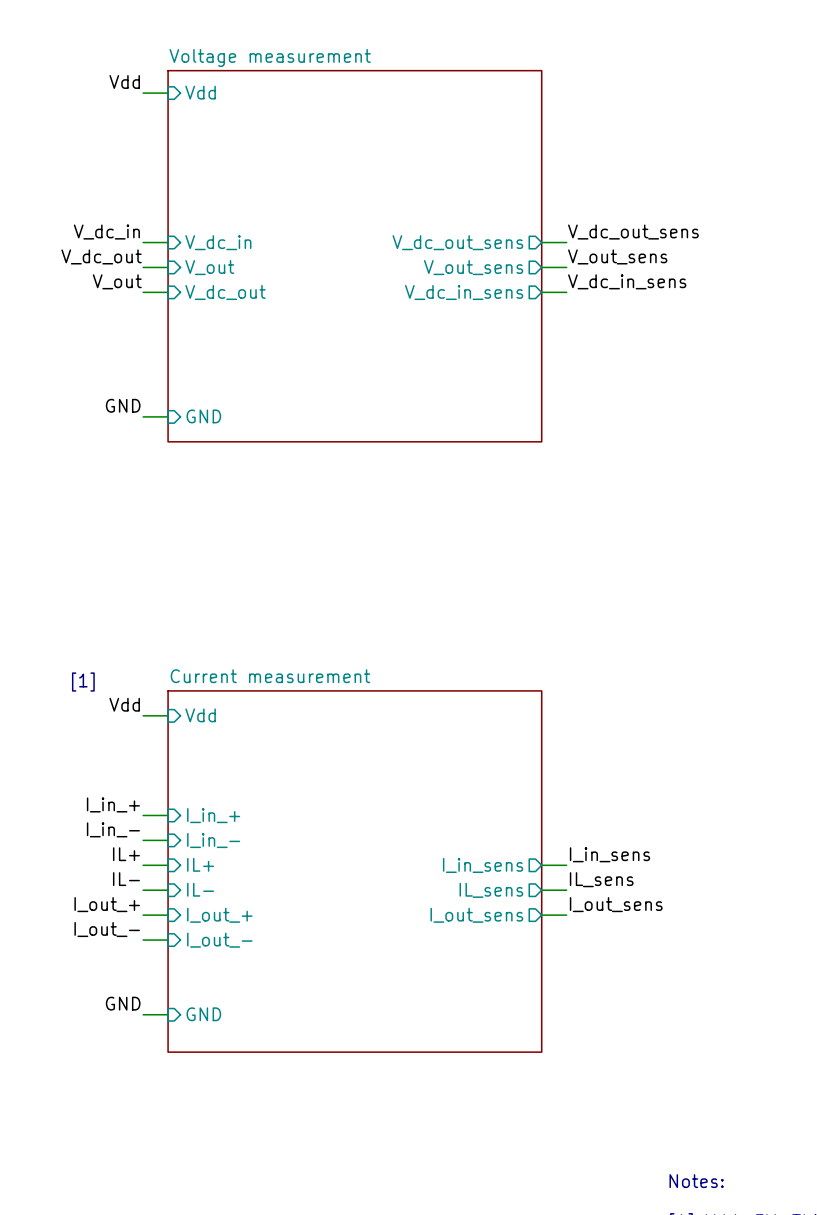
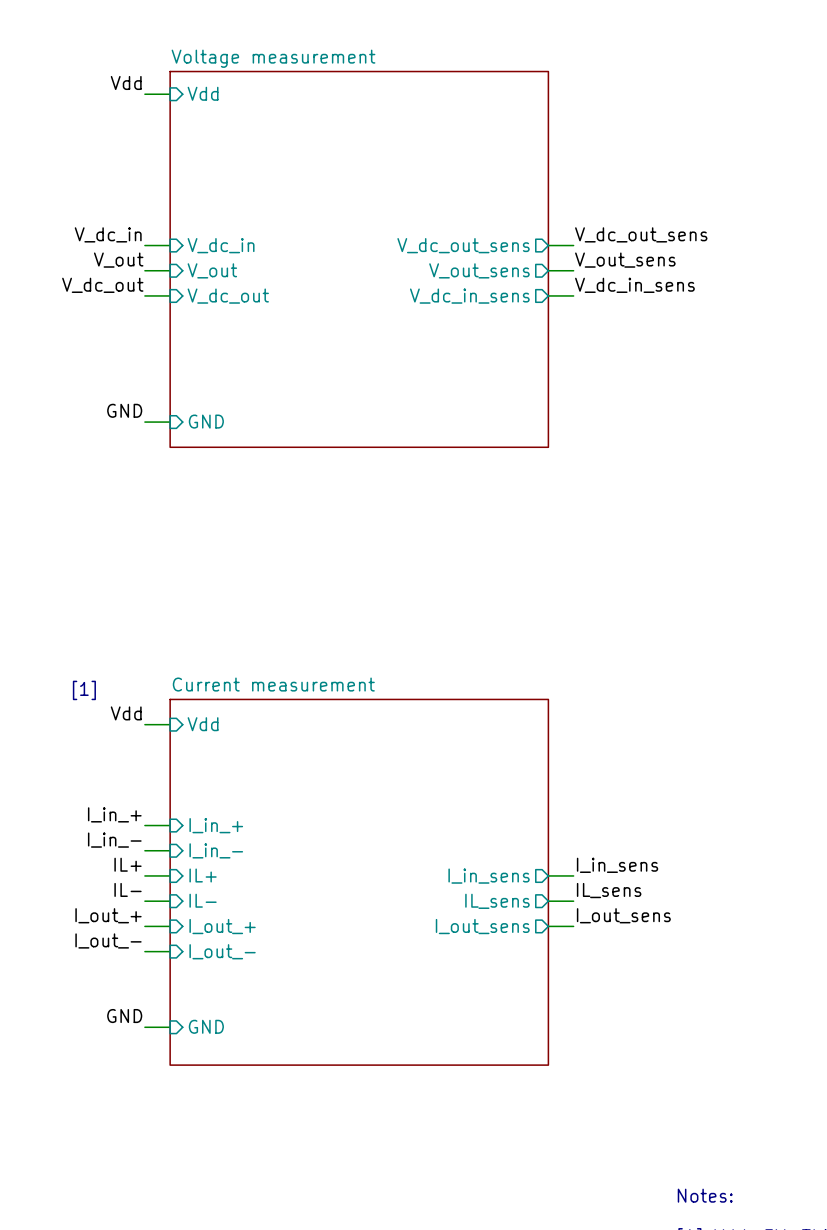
label: V_dc_out (101, 256) -> V_out (118, 260)
label: V_out (117, 281) -> V_dc_out (102, 285)

